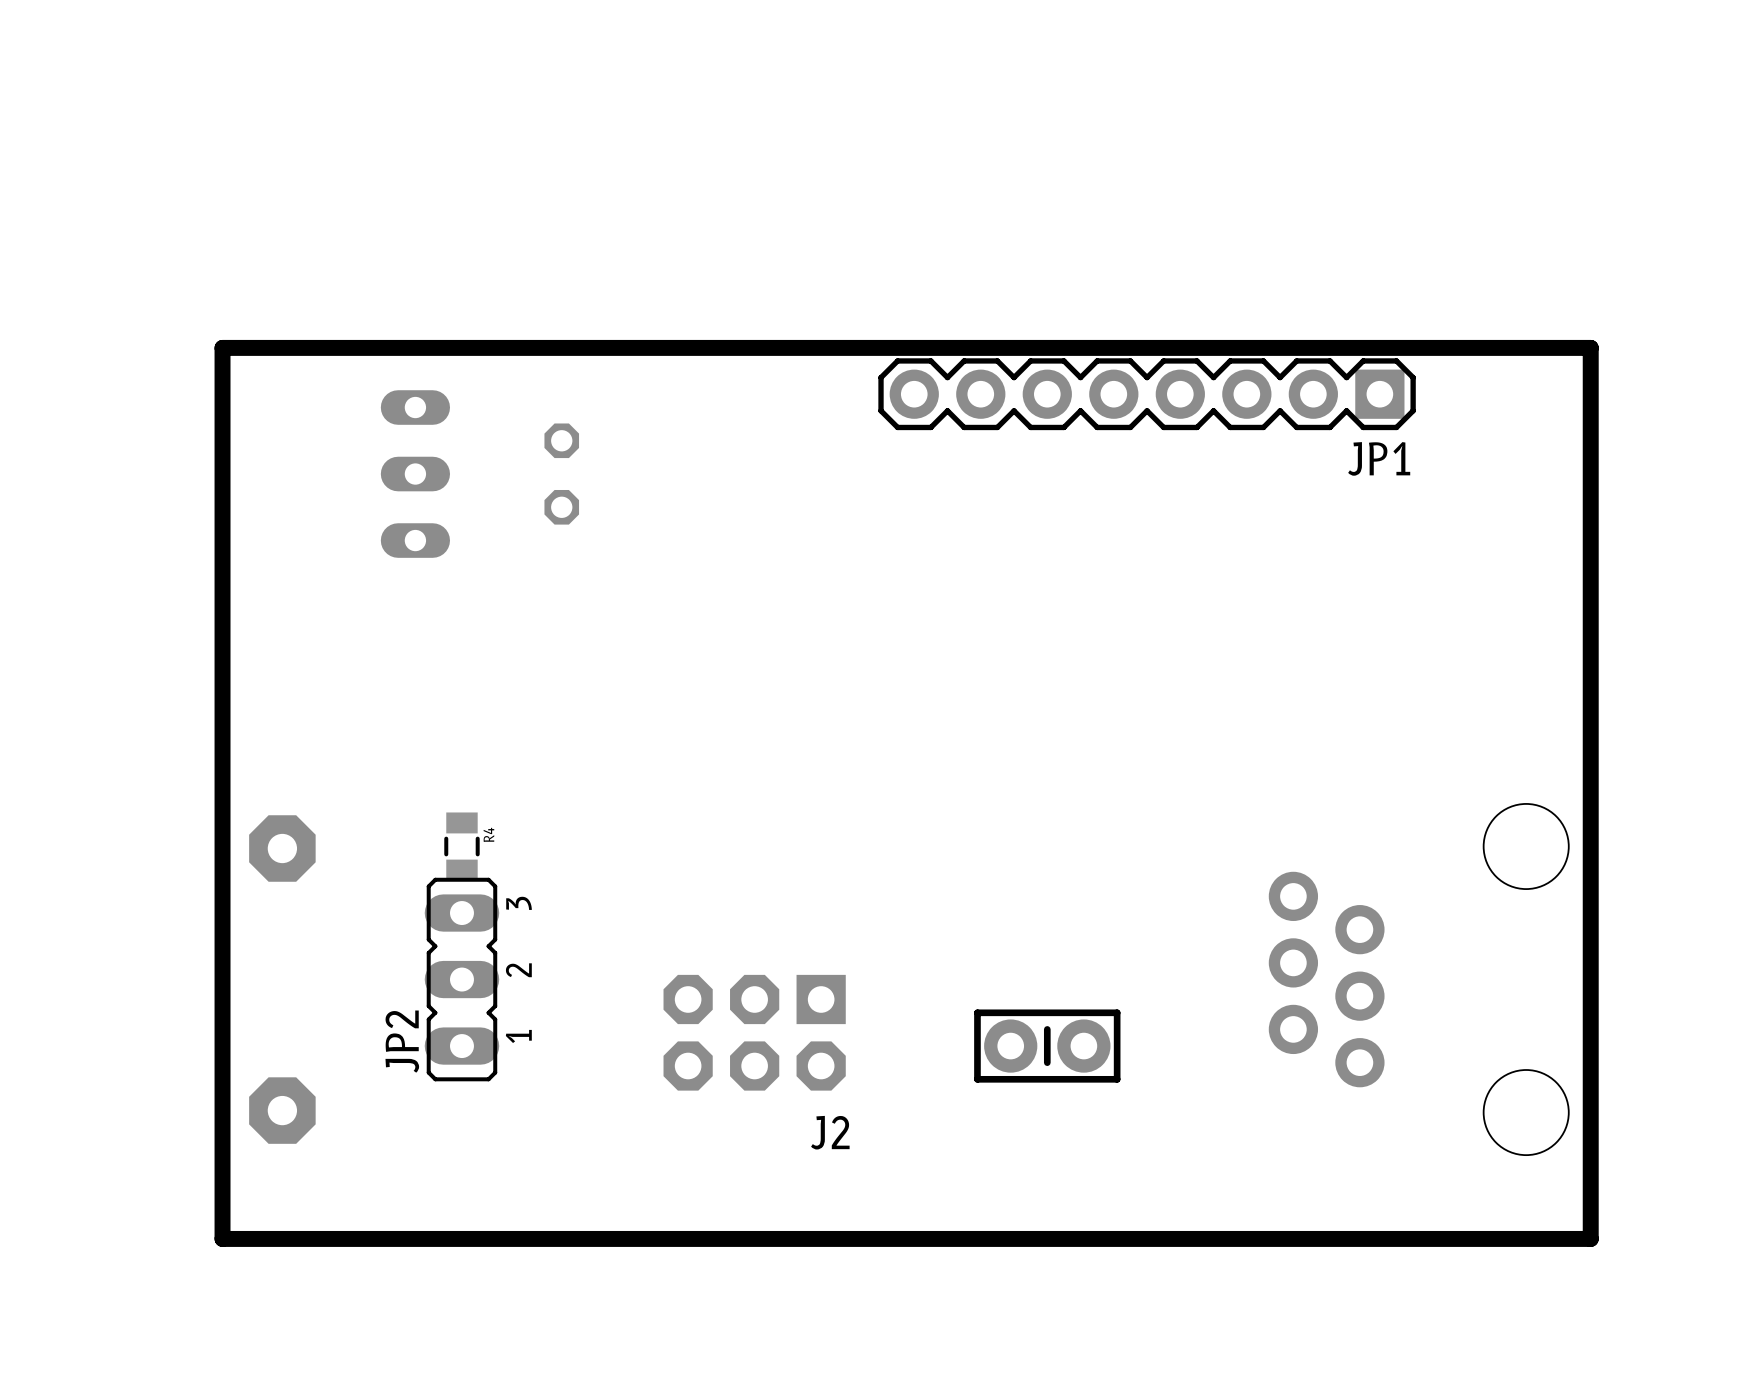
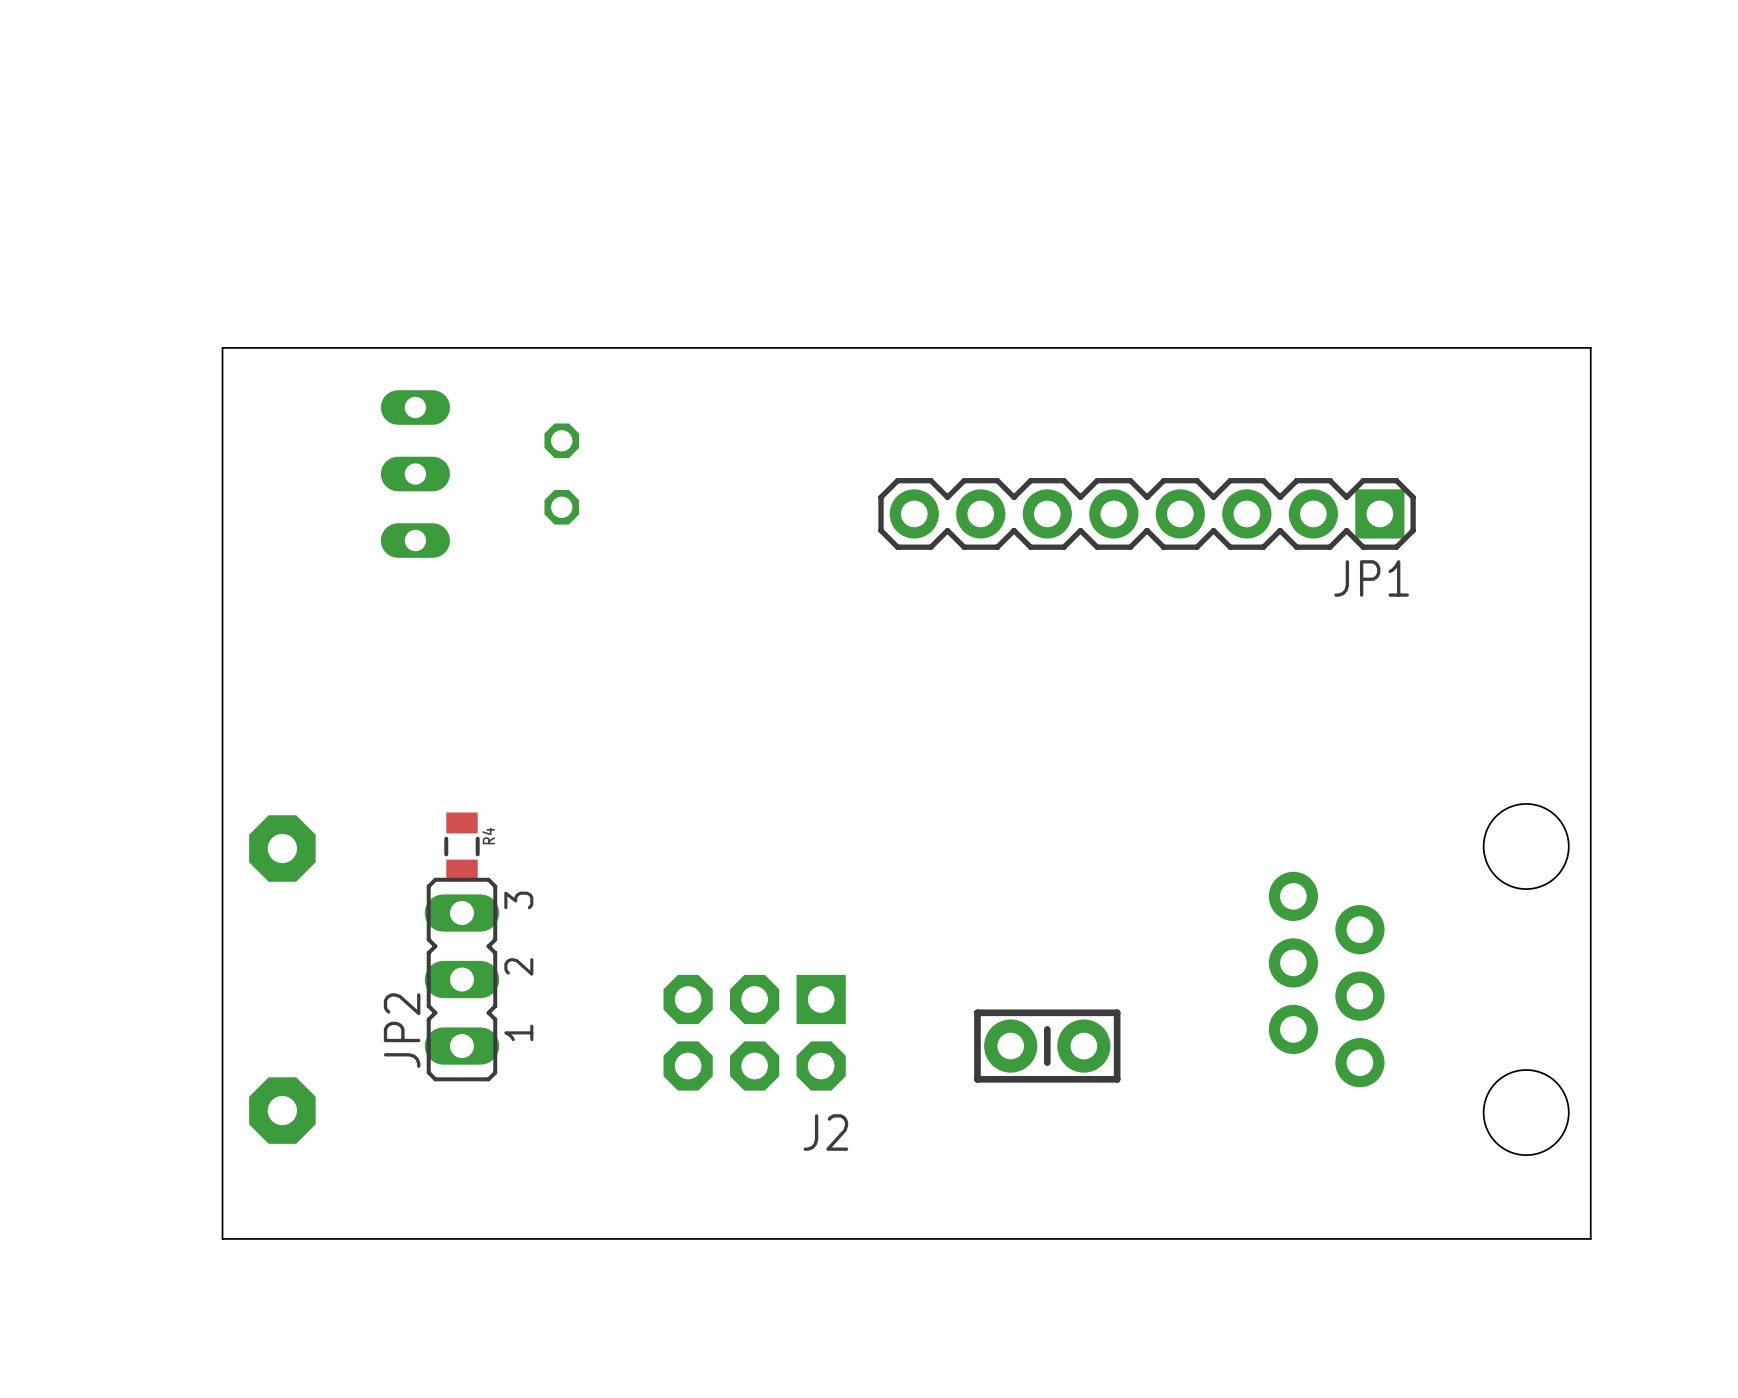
board edge width: thick (222, 347) (1590, 347) (1590, 1238) (222, 1238) (222, 347) -> thin (222, 347) (1590, 347) (1590, 1238) (222, 1238) (222, 347)
JP1 position: (1147, 394) -> (1147, 513)

